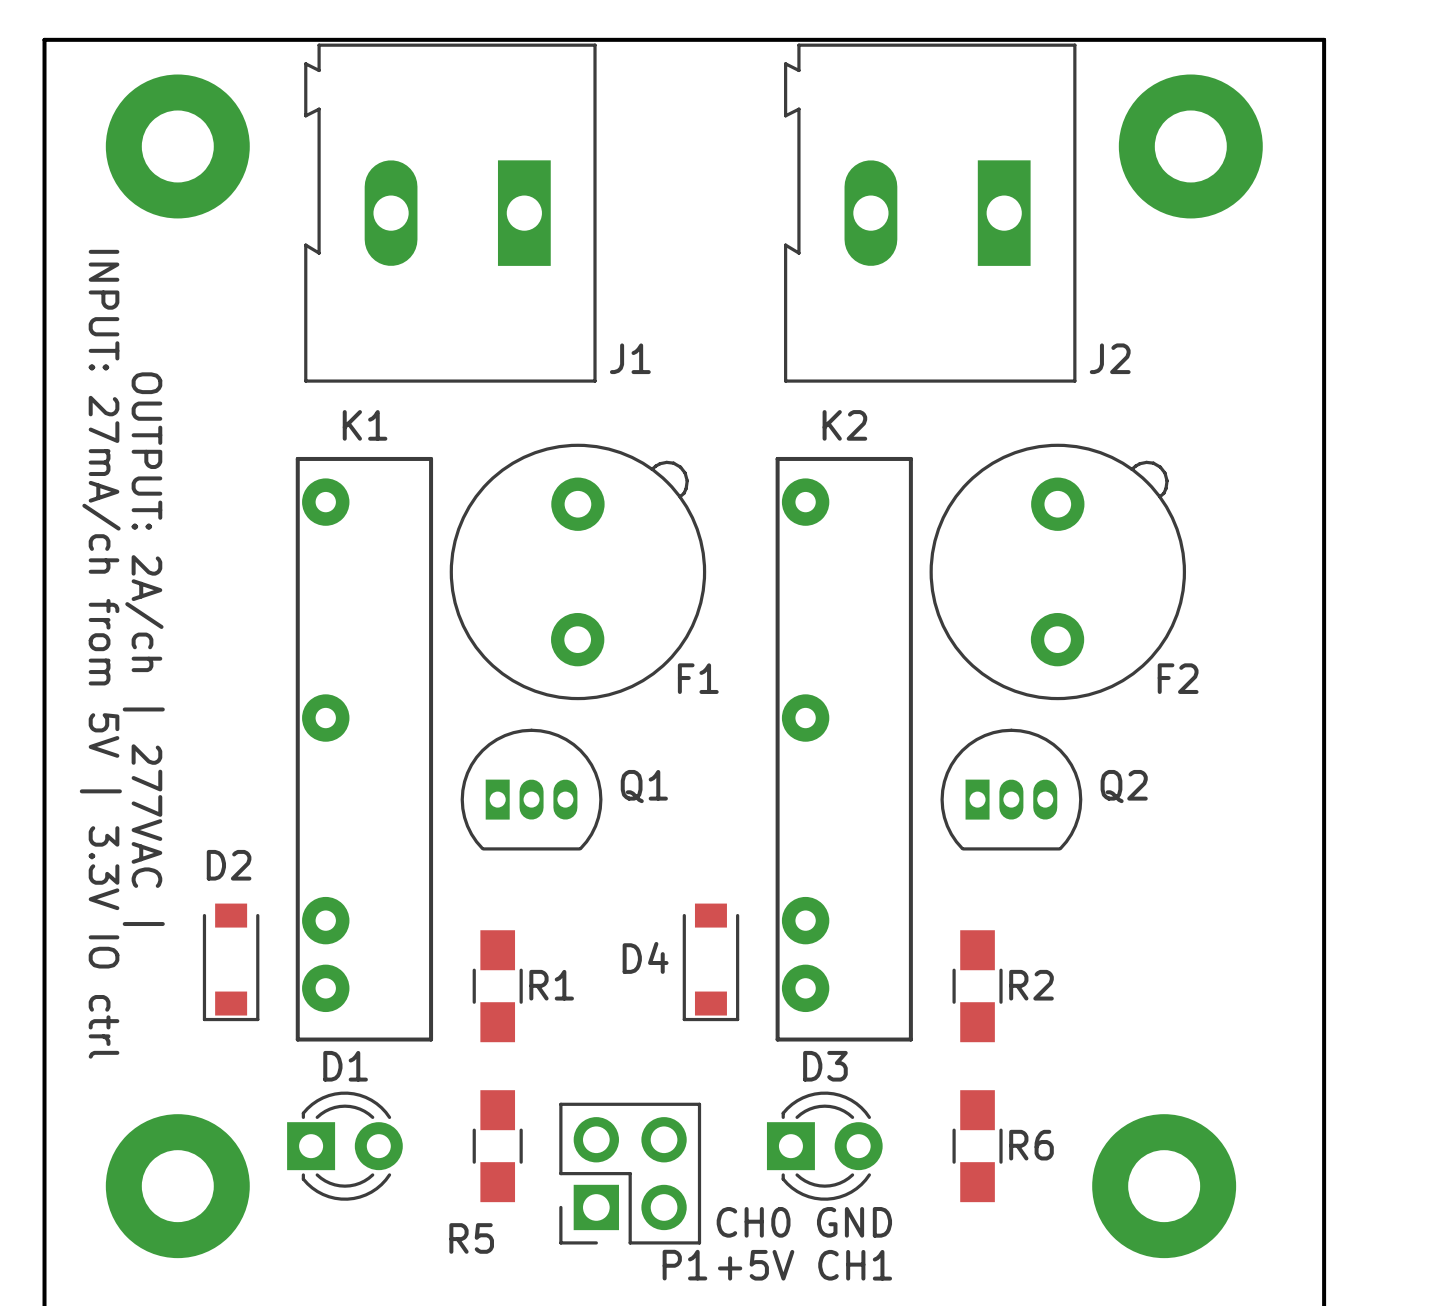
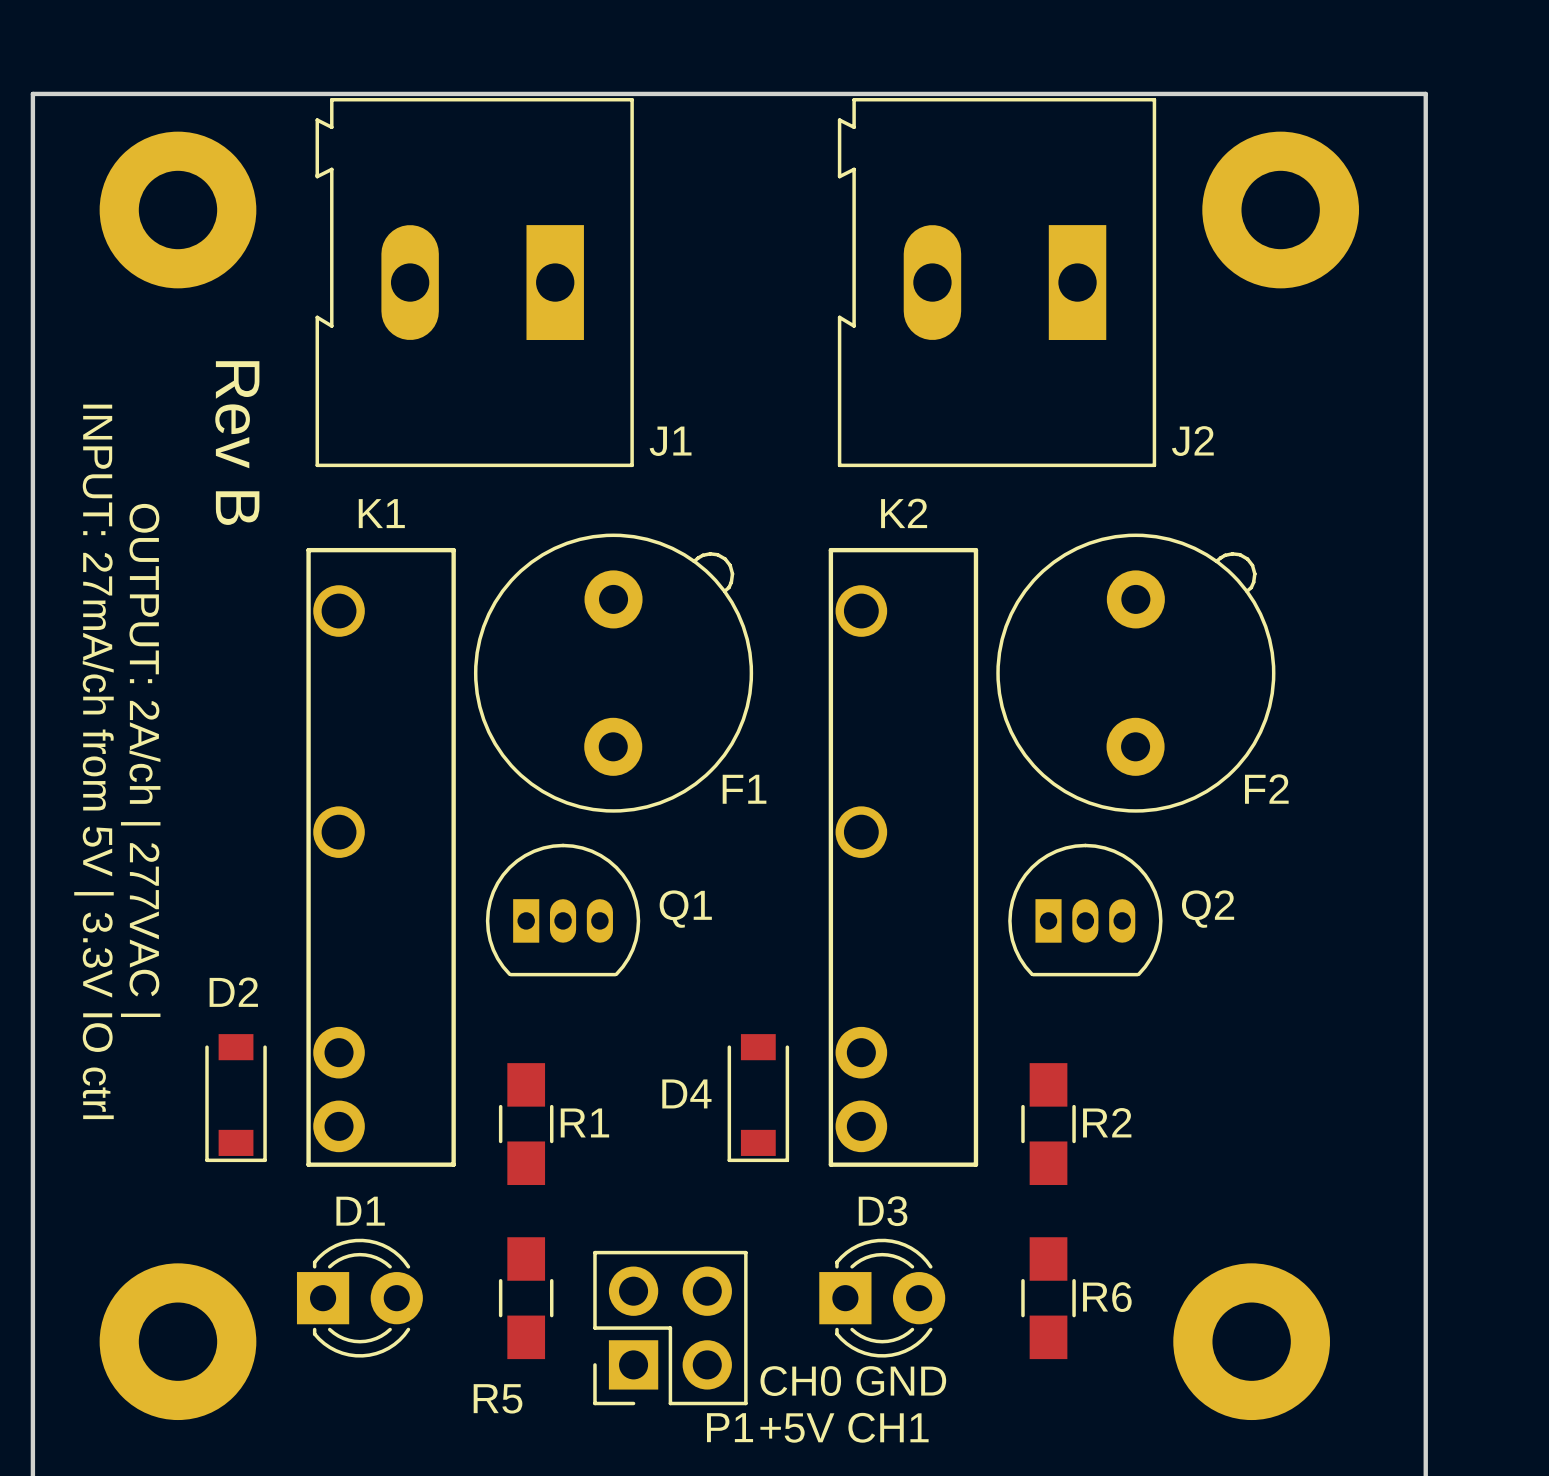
text: none -> Rev B (237, 443)
K1 footprint: [295, 456, 434, 1042] -> [306, 547, 456, 1167]
K2 footprint: [775, 456, 913, 1042] -> [828, 547, 979, 1167]

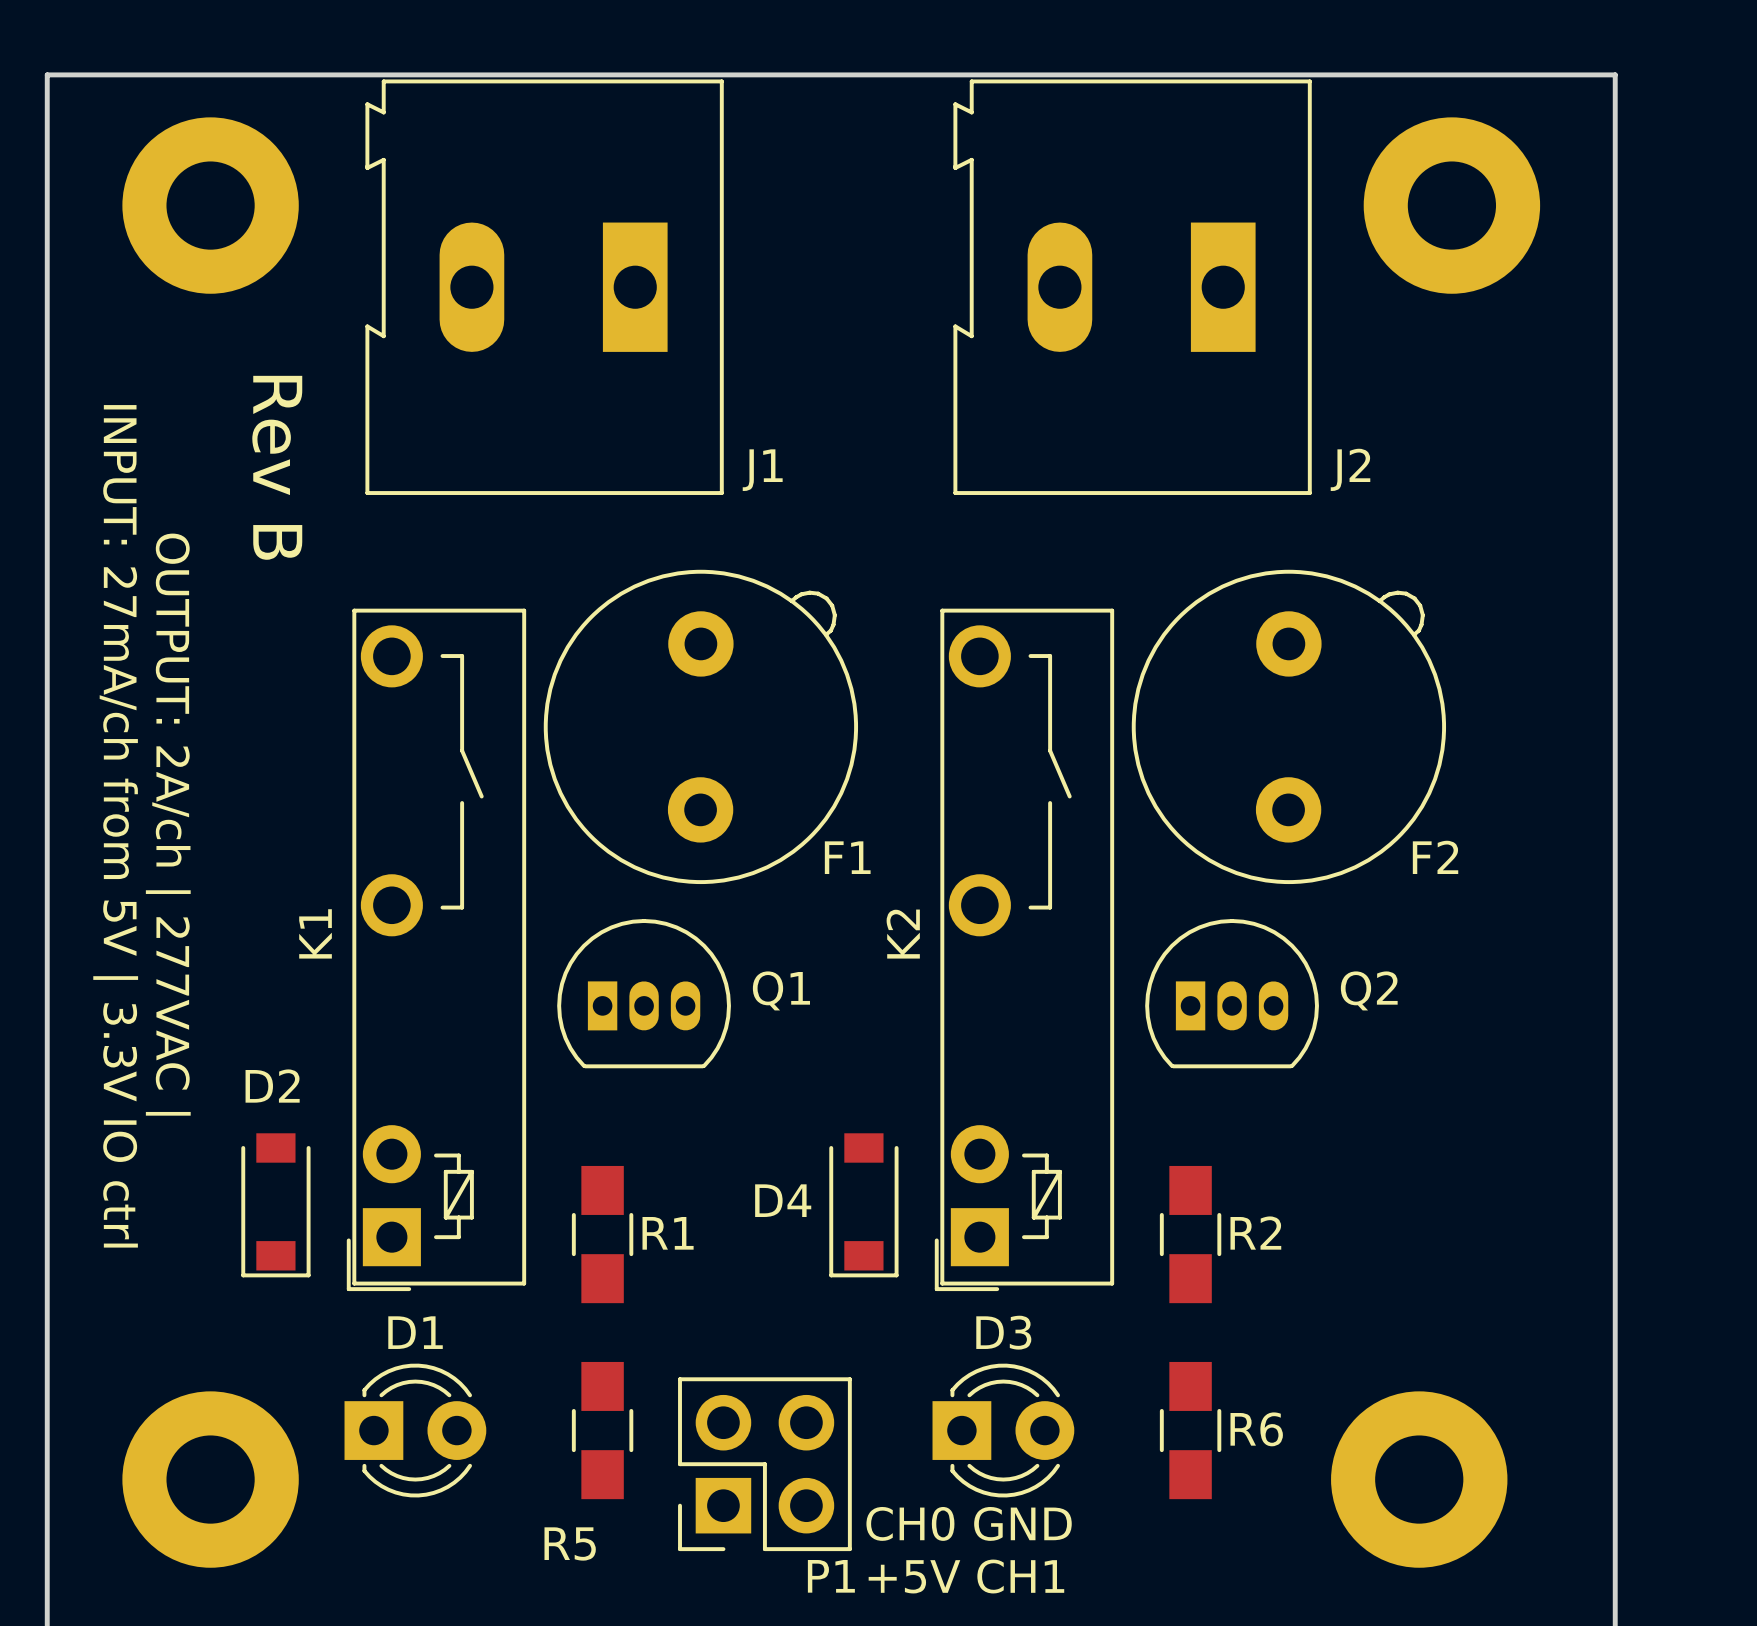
K1 name position: K1 (381, 513) -> K1 (315, 933)
K2 name position: K2 (904, 513) -> K2 (903, 934)
K1 footprint: [306, 547, 456, 1167] -> [346, 608, 527, 1292]
K2 footprint: [828, 547, 979, 1167] -> [934, 608, 1115, 1292]

